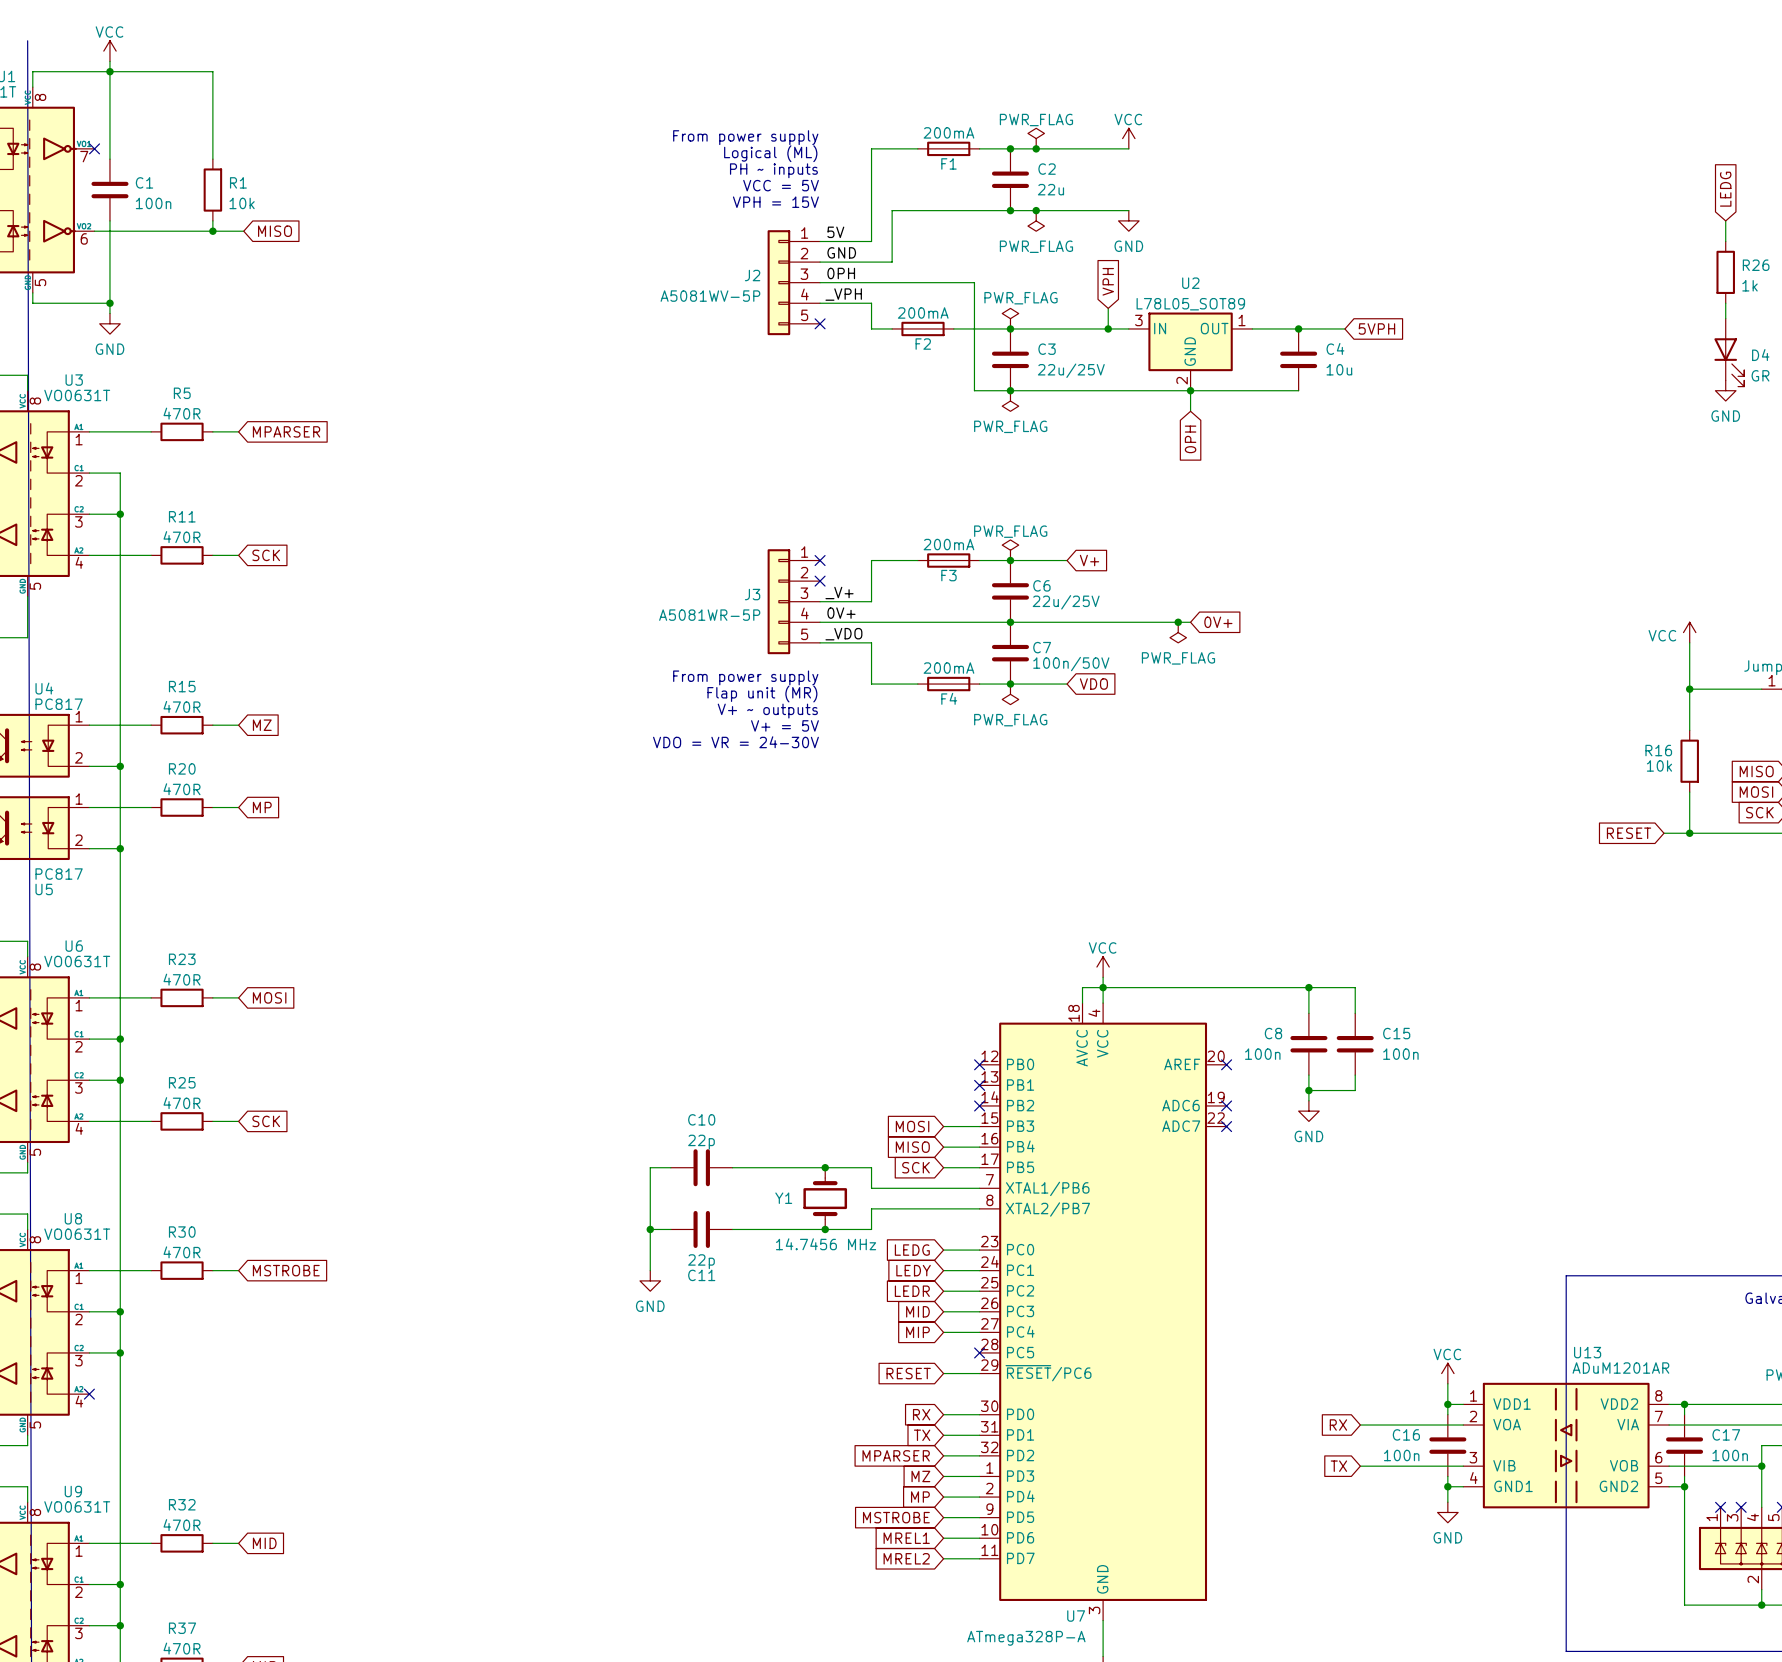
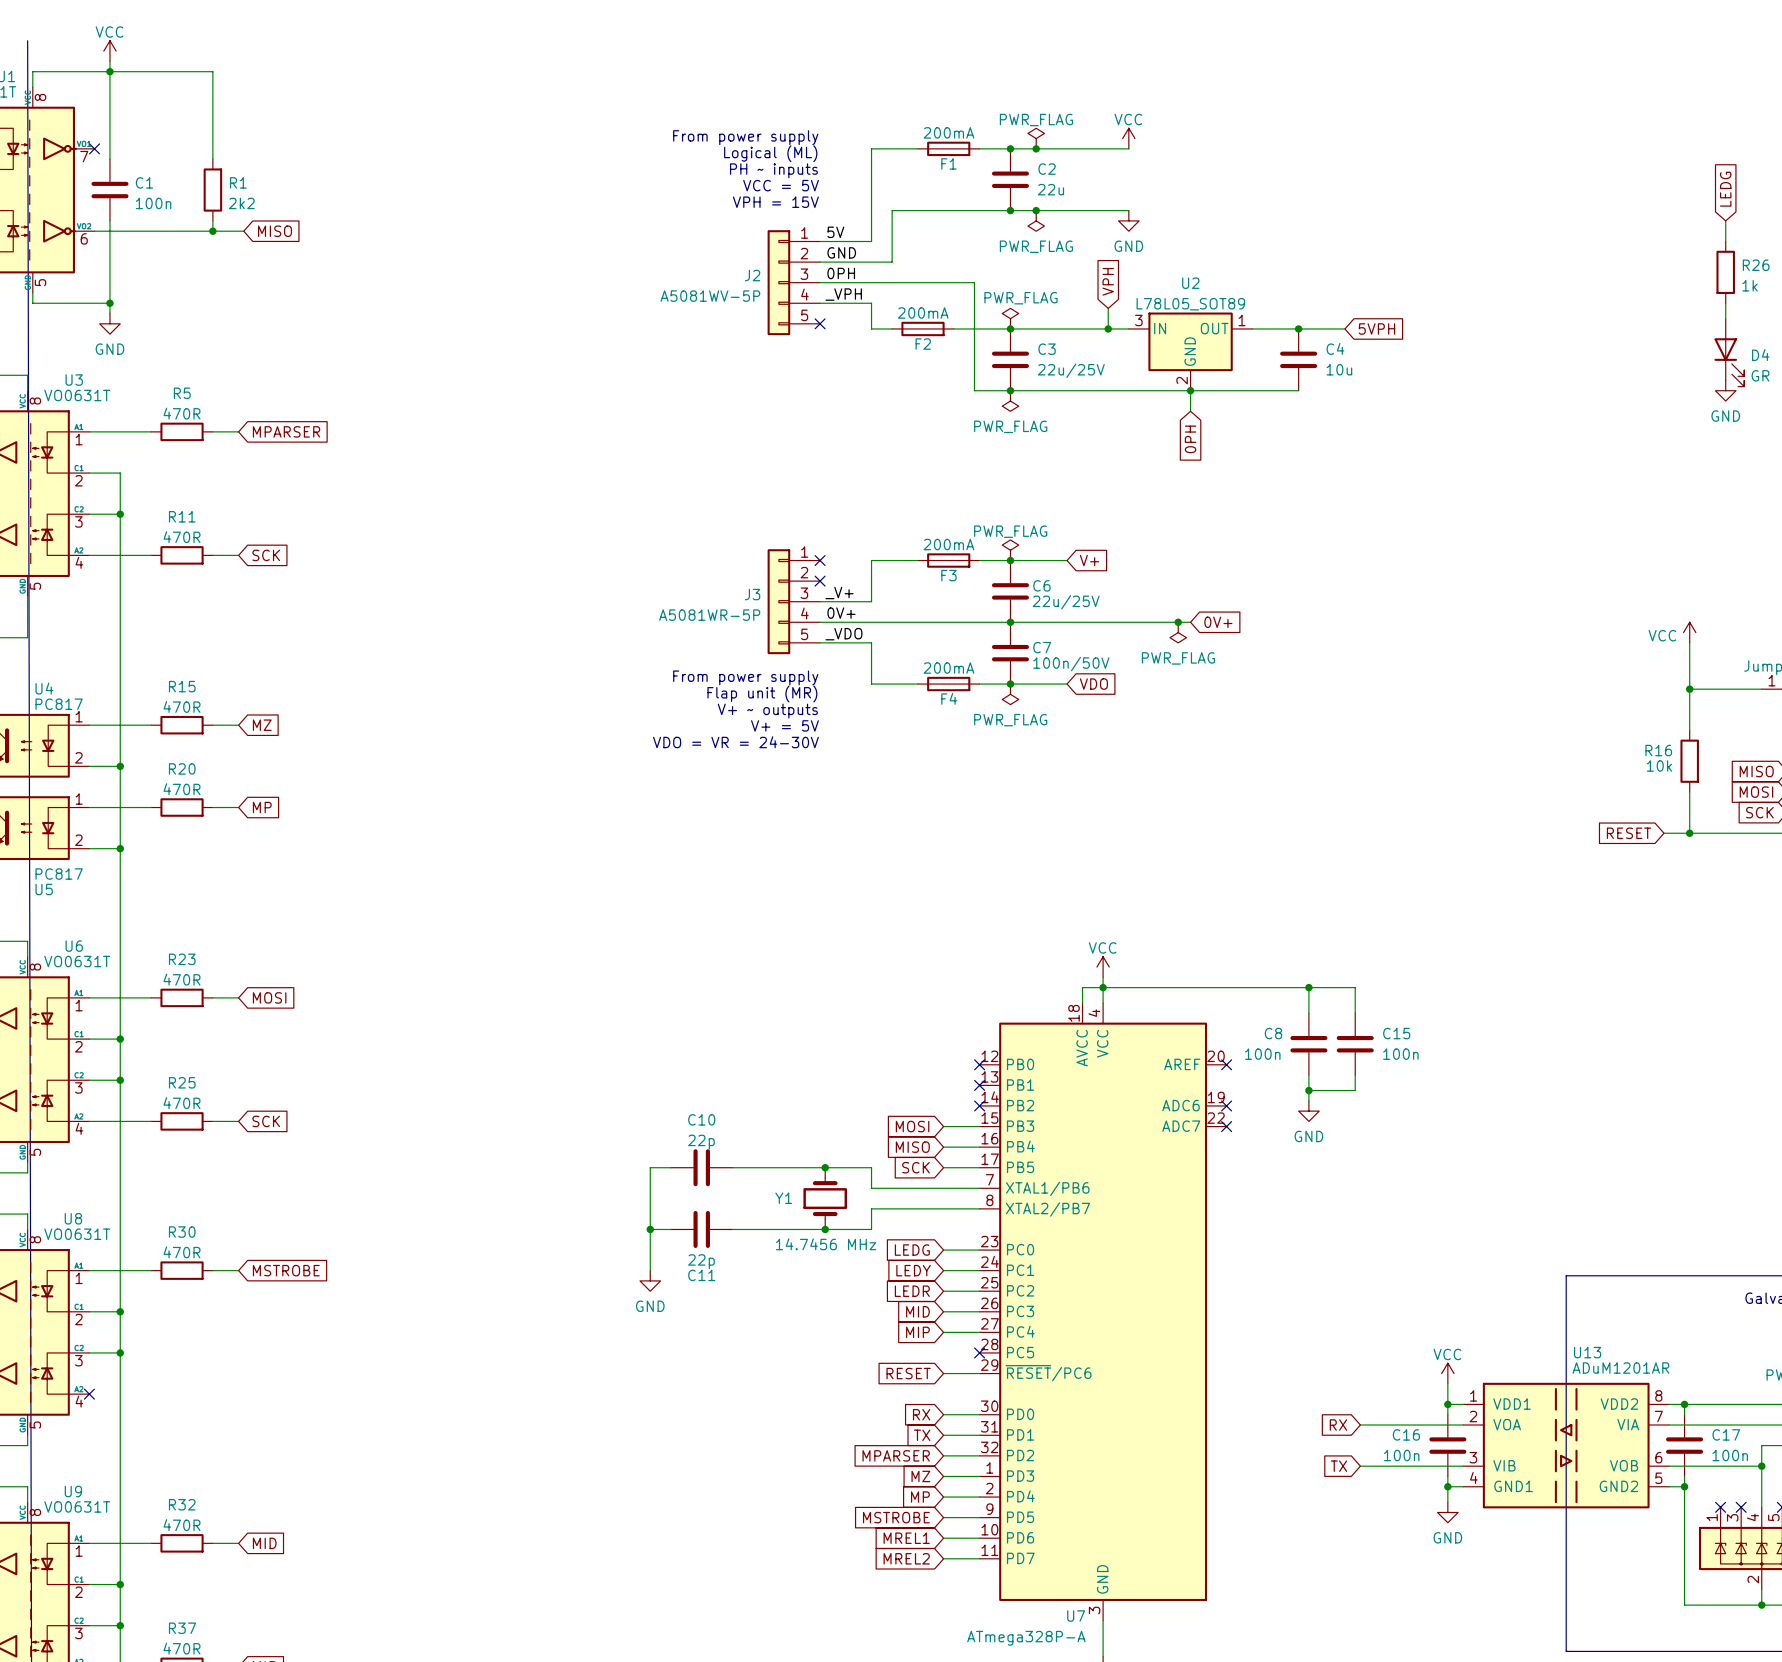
R1 value: 10k (242, 203) -> 2k2 (241, 203)

